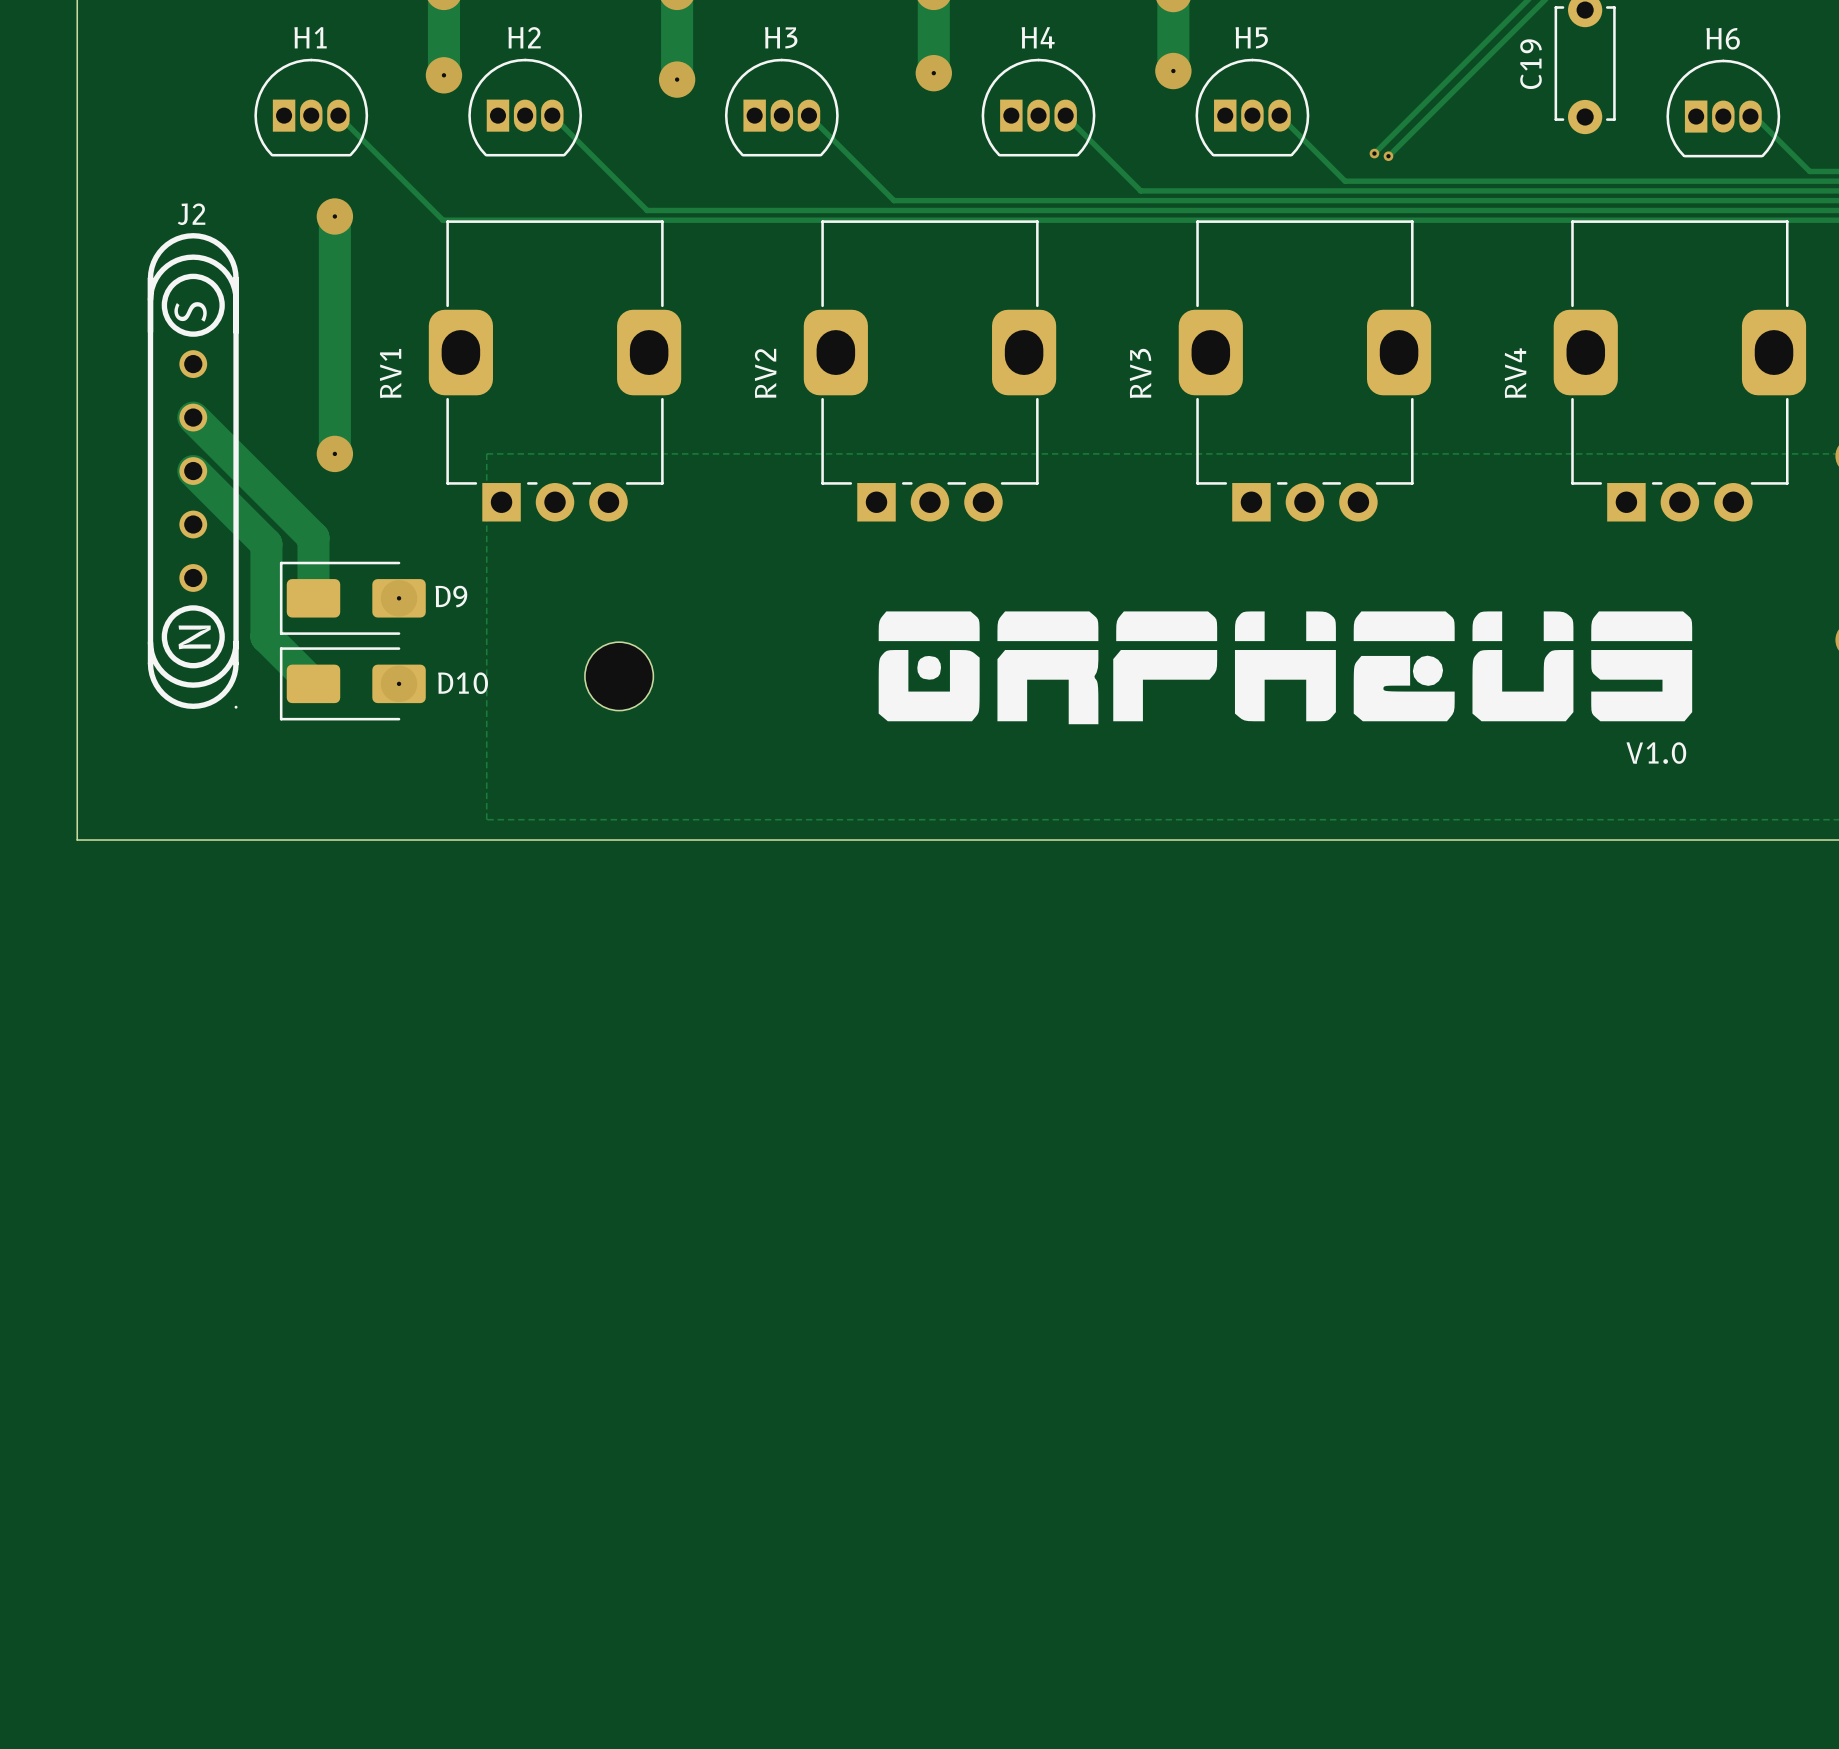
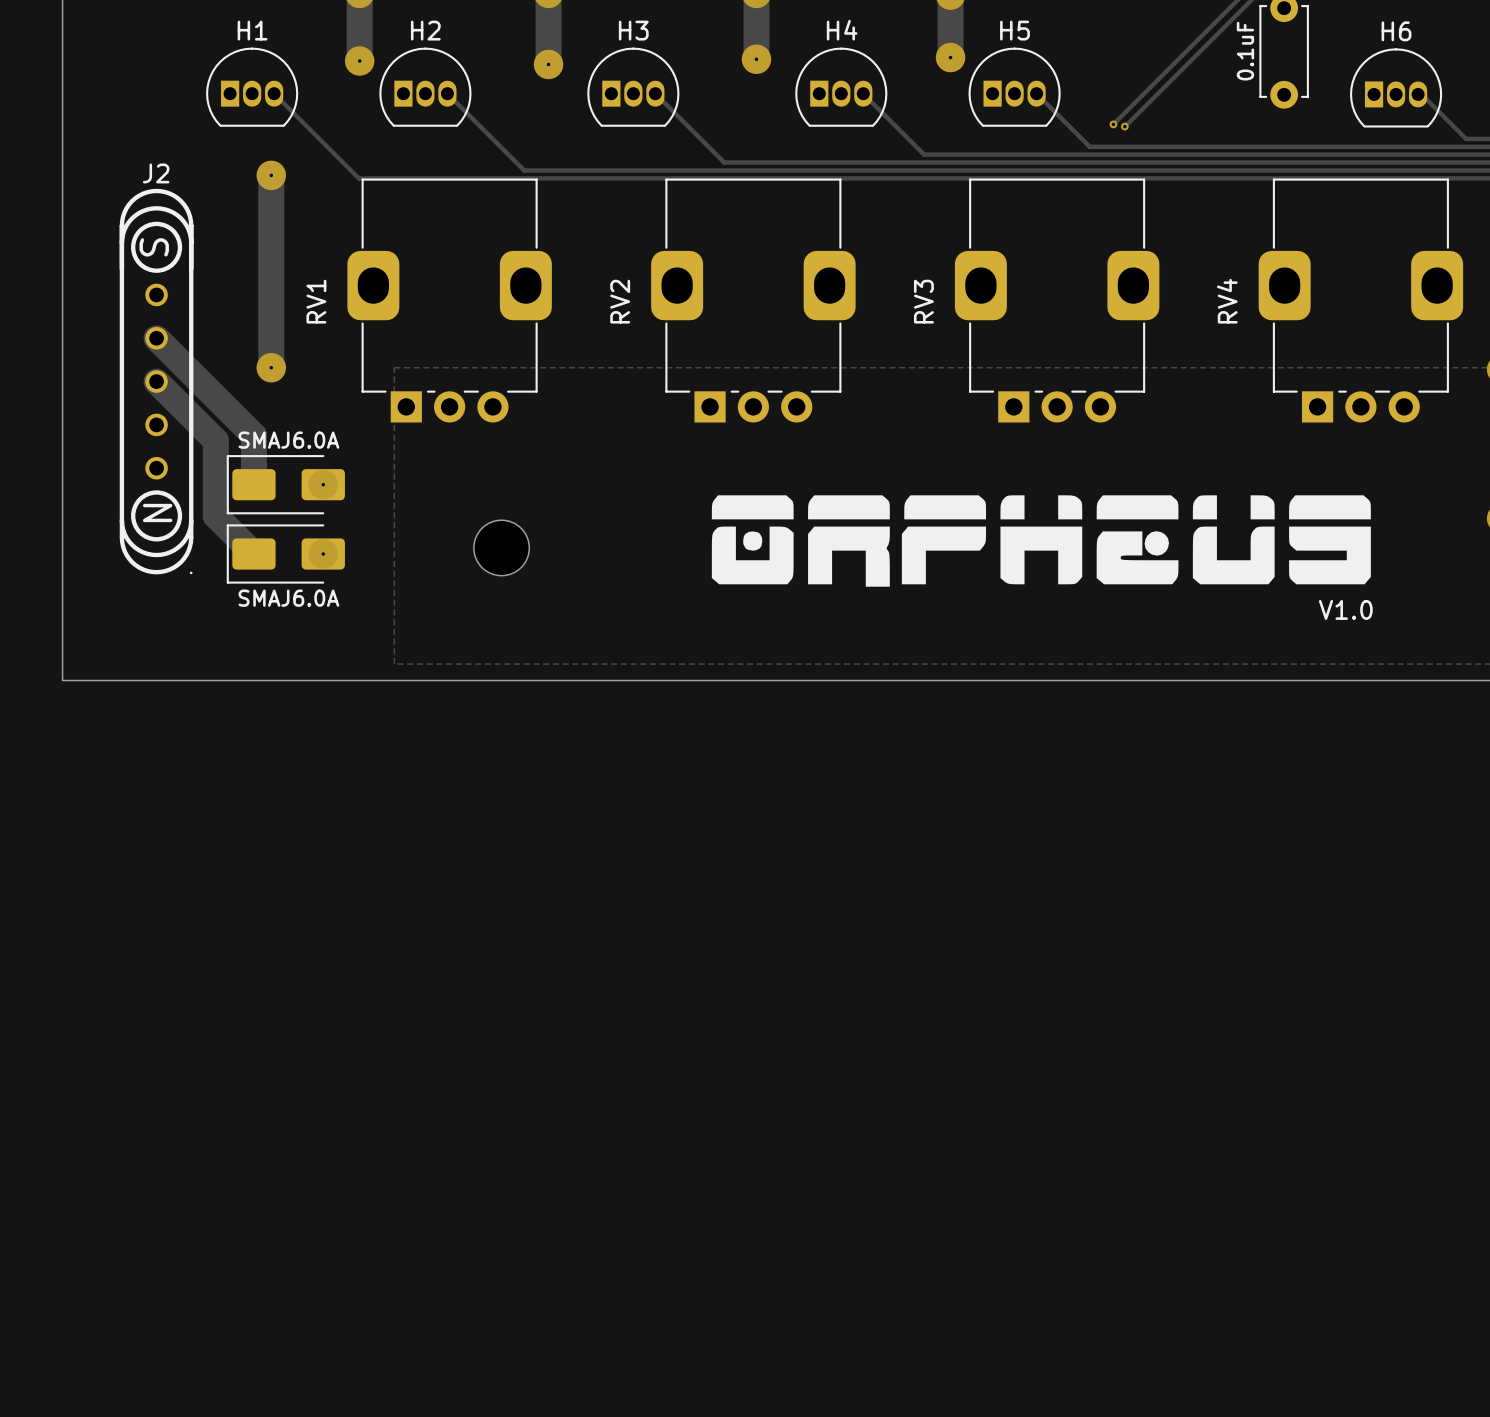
C19 value: none -> 0.1uF (1245, 51)
C19 name: C19 (1530, 64) -> none
D9 value: none -> SMAJ6.0A (288, 440)
D9 name: D9 (451, 596) -> none
D10 name: D10 (463, 683) -> none
D10 value: none -> SMAJ6.0A (288, 598)

